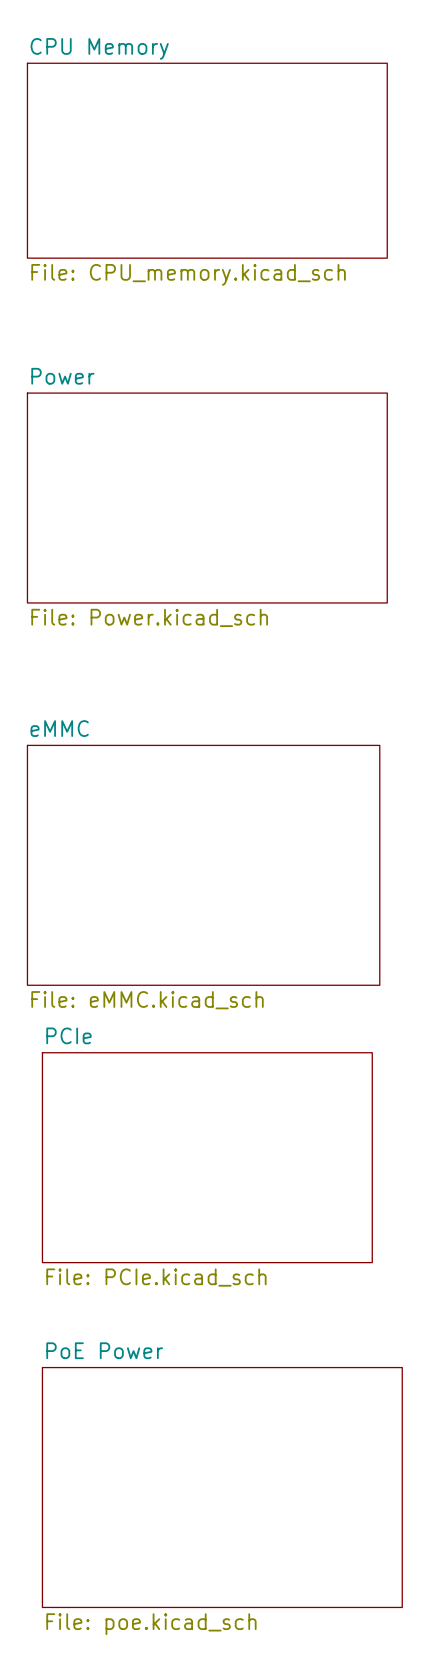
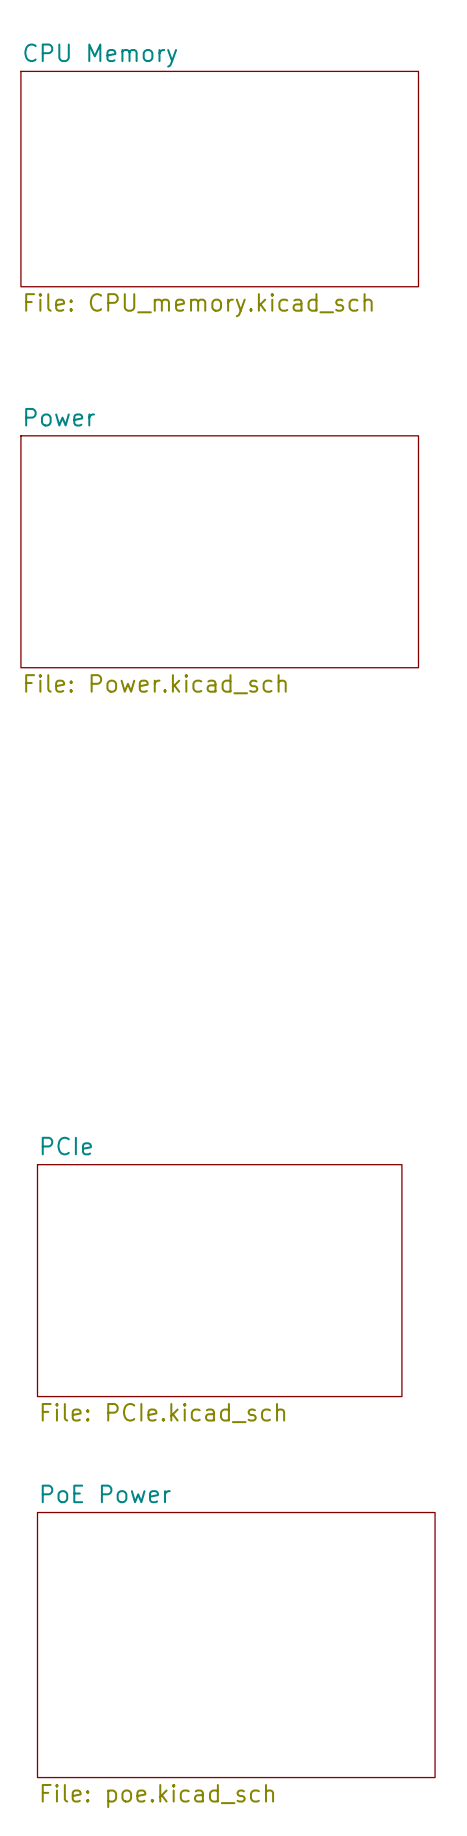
sheet eMMC: File: eMMC.kicad_sch (203, 865) -> none

